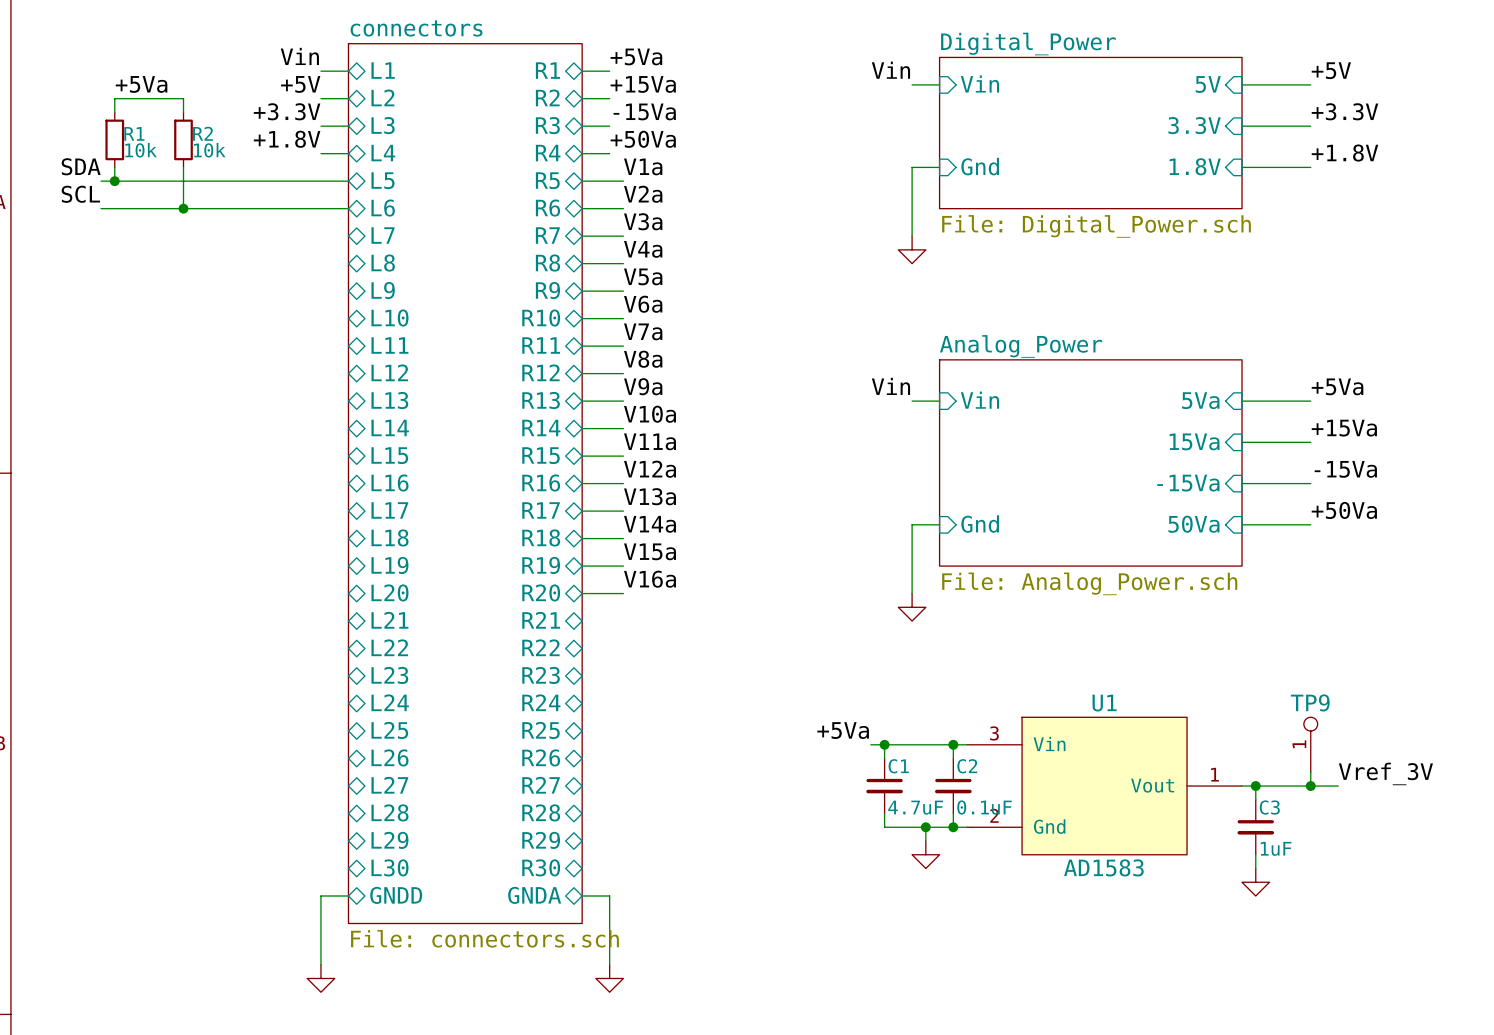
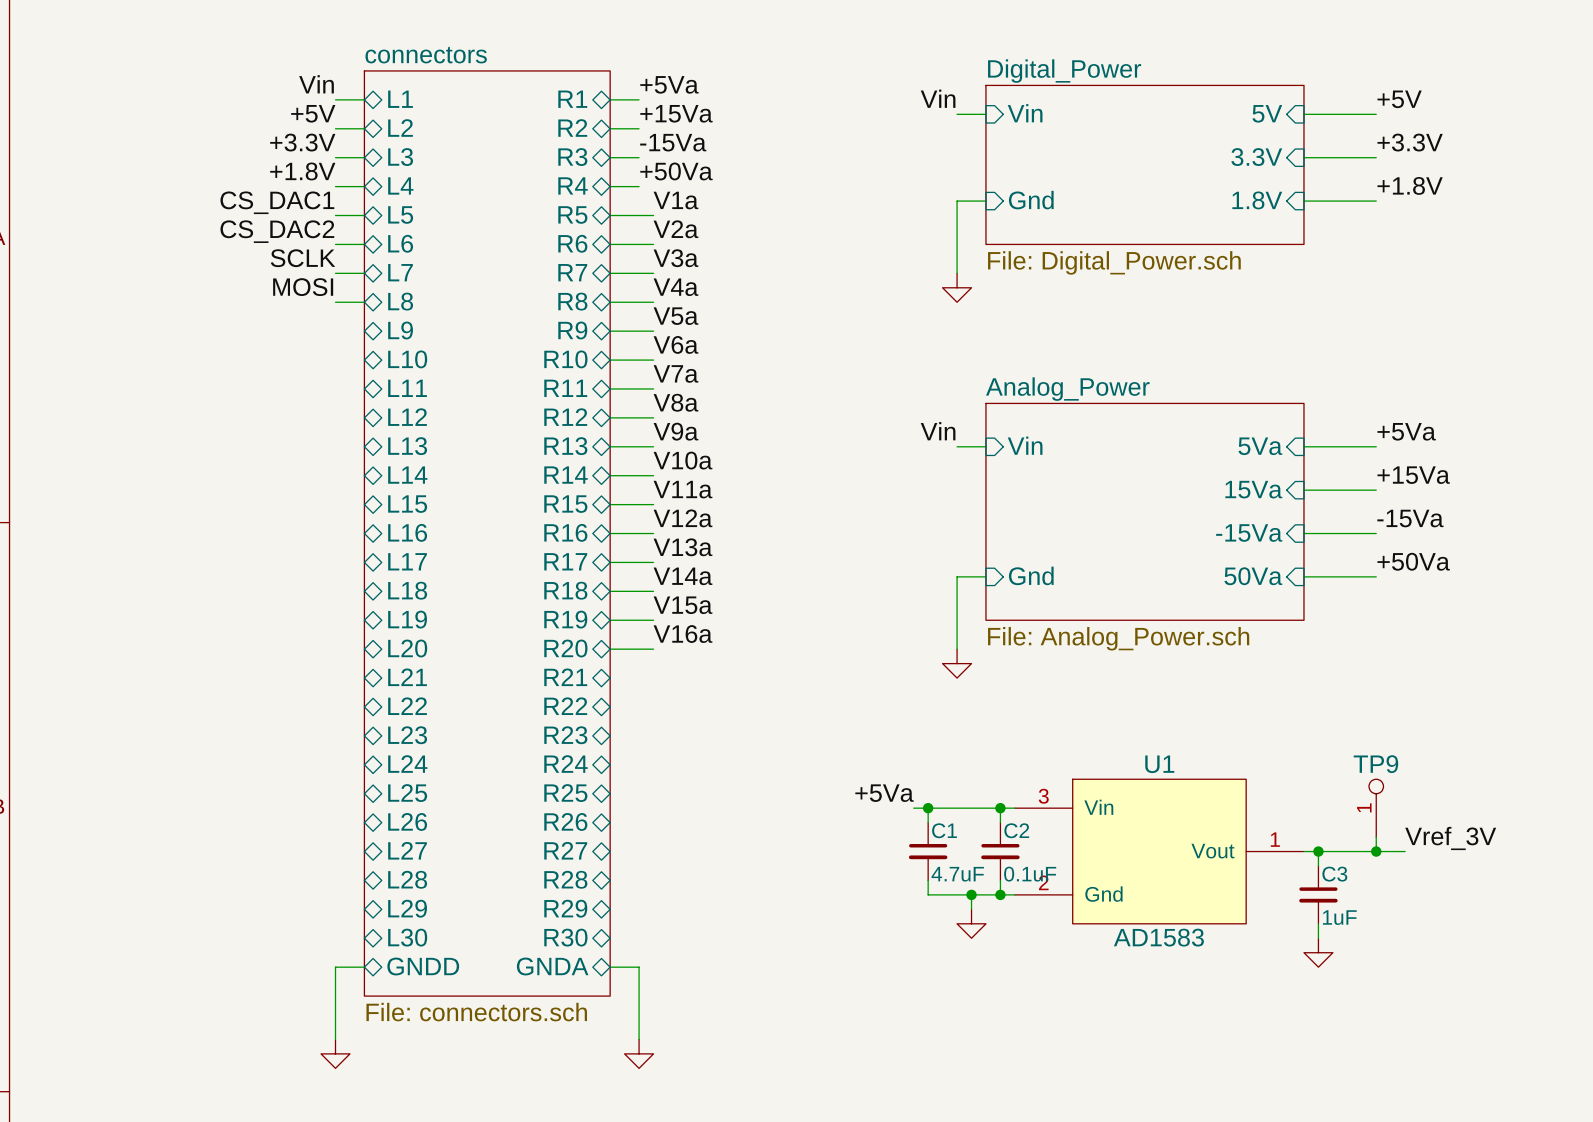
label: +5Va (141, 84) -> none
wire: (114, 112) (114, 98) (183, 98) (183, 112) -> none
R1: 10k (114, 139) -> none
R2: 10k (183, 139) -> none
label: SDA (81, 166) -> none
wire: (114, 167) (114, 181) -> none
wire: (183, 167) (183, 208) -> none
label: none -> CS_DAC1 (277, 202)
wire: (101, 181) (320, 181) -> none
junction: (114, 181) -> none
label: SCL (80, 194) -> none
label: none -> CS_DAC2 (277, 231)
wire: (101, 208) (320, 208) -> none
junction: (183, 208) -> none
label: none -> SCLK (303, 258)
wire: none -> (335, 273) (364, 273)
label: none -> MOSI (303, 287)
wire: none -> (335, 302) (364, 302)

